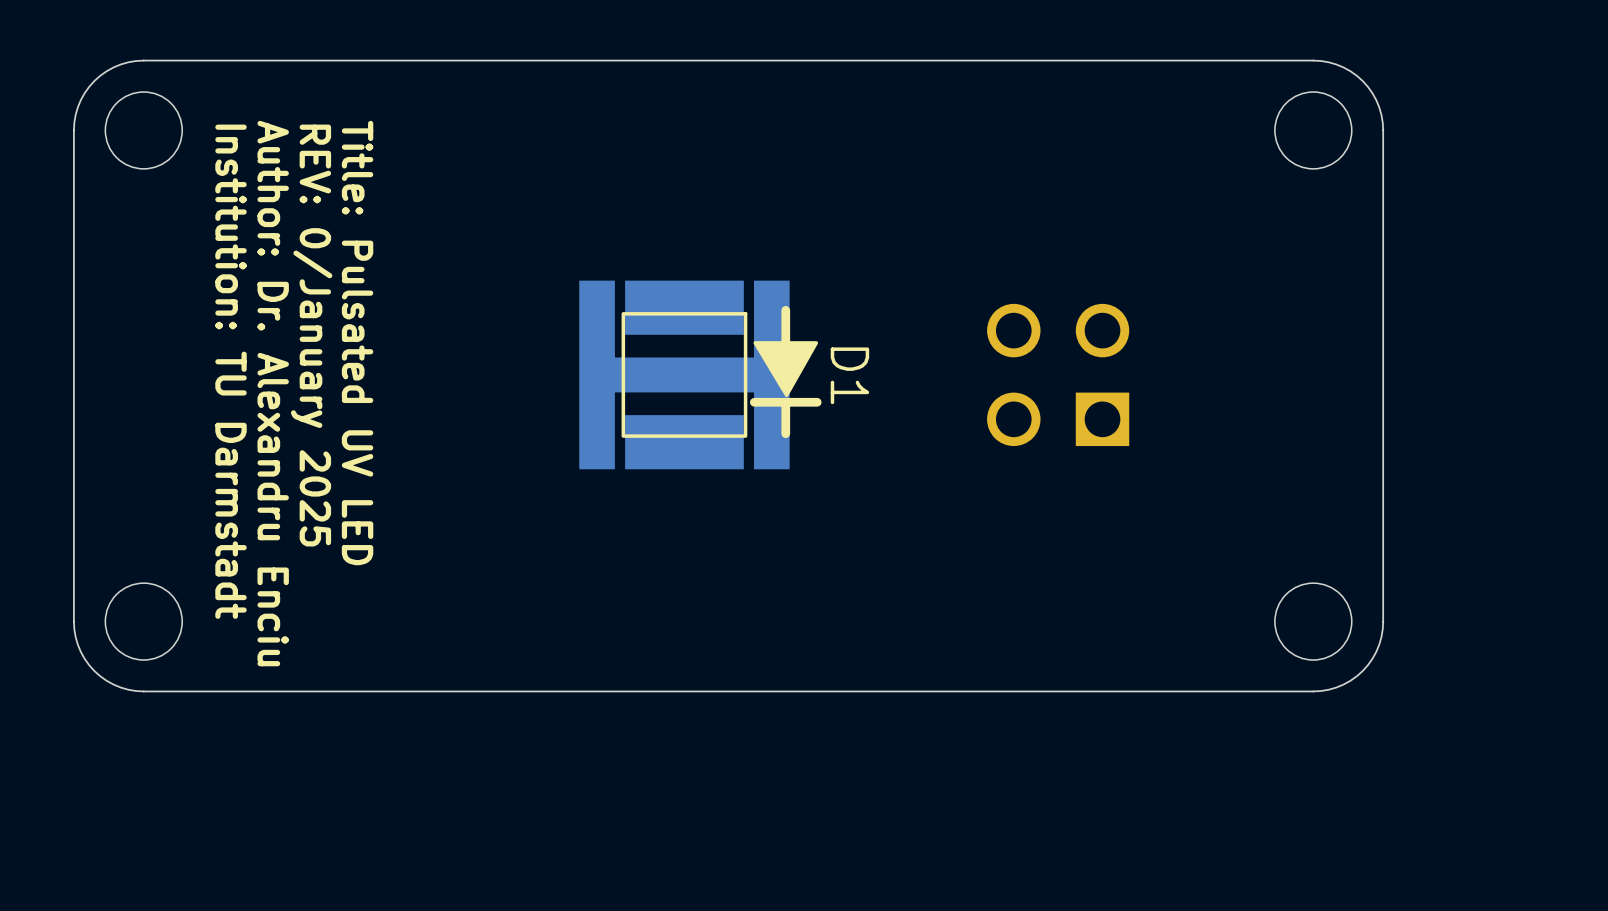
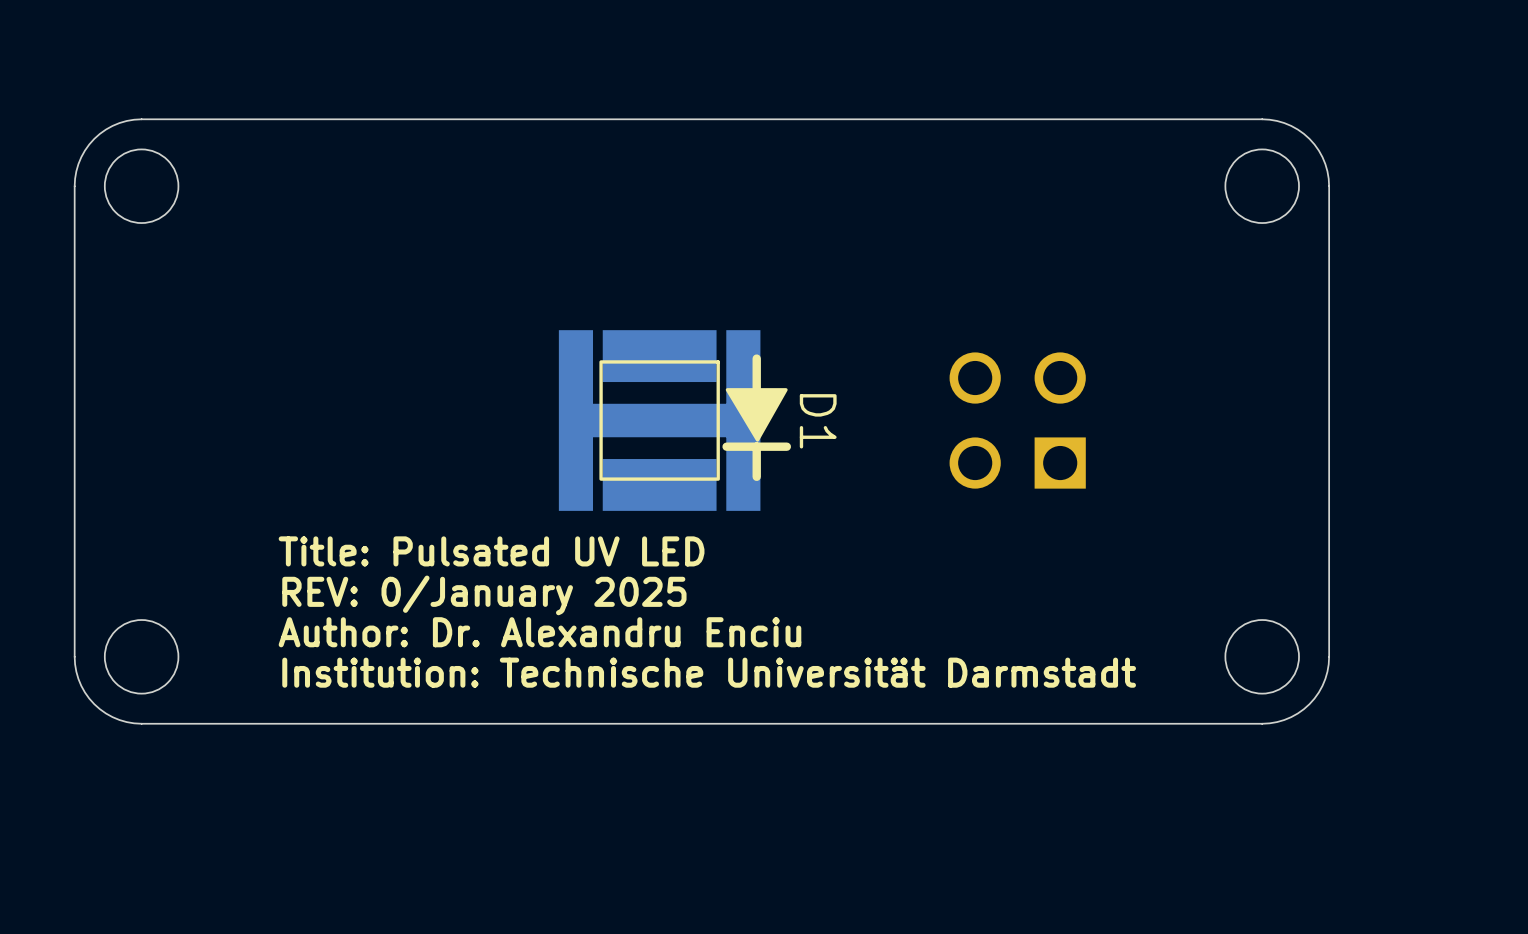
text rotation: 0° (311, 335) -> 90° counterclockwise (484, 595)
text rotation: 0° (357, 343) -> 90° counterclockwise (491, 551)
text: Institution: TU Darmstadt (231, 371) -> none
text rotation: 0° (273, 393) -> 90° counterclockwise (539, 632)
text: none -> Institution: Technische Universität Darmstadt (709, 672)

